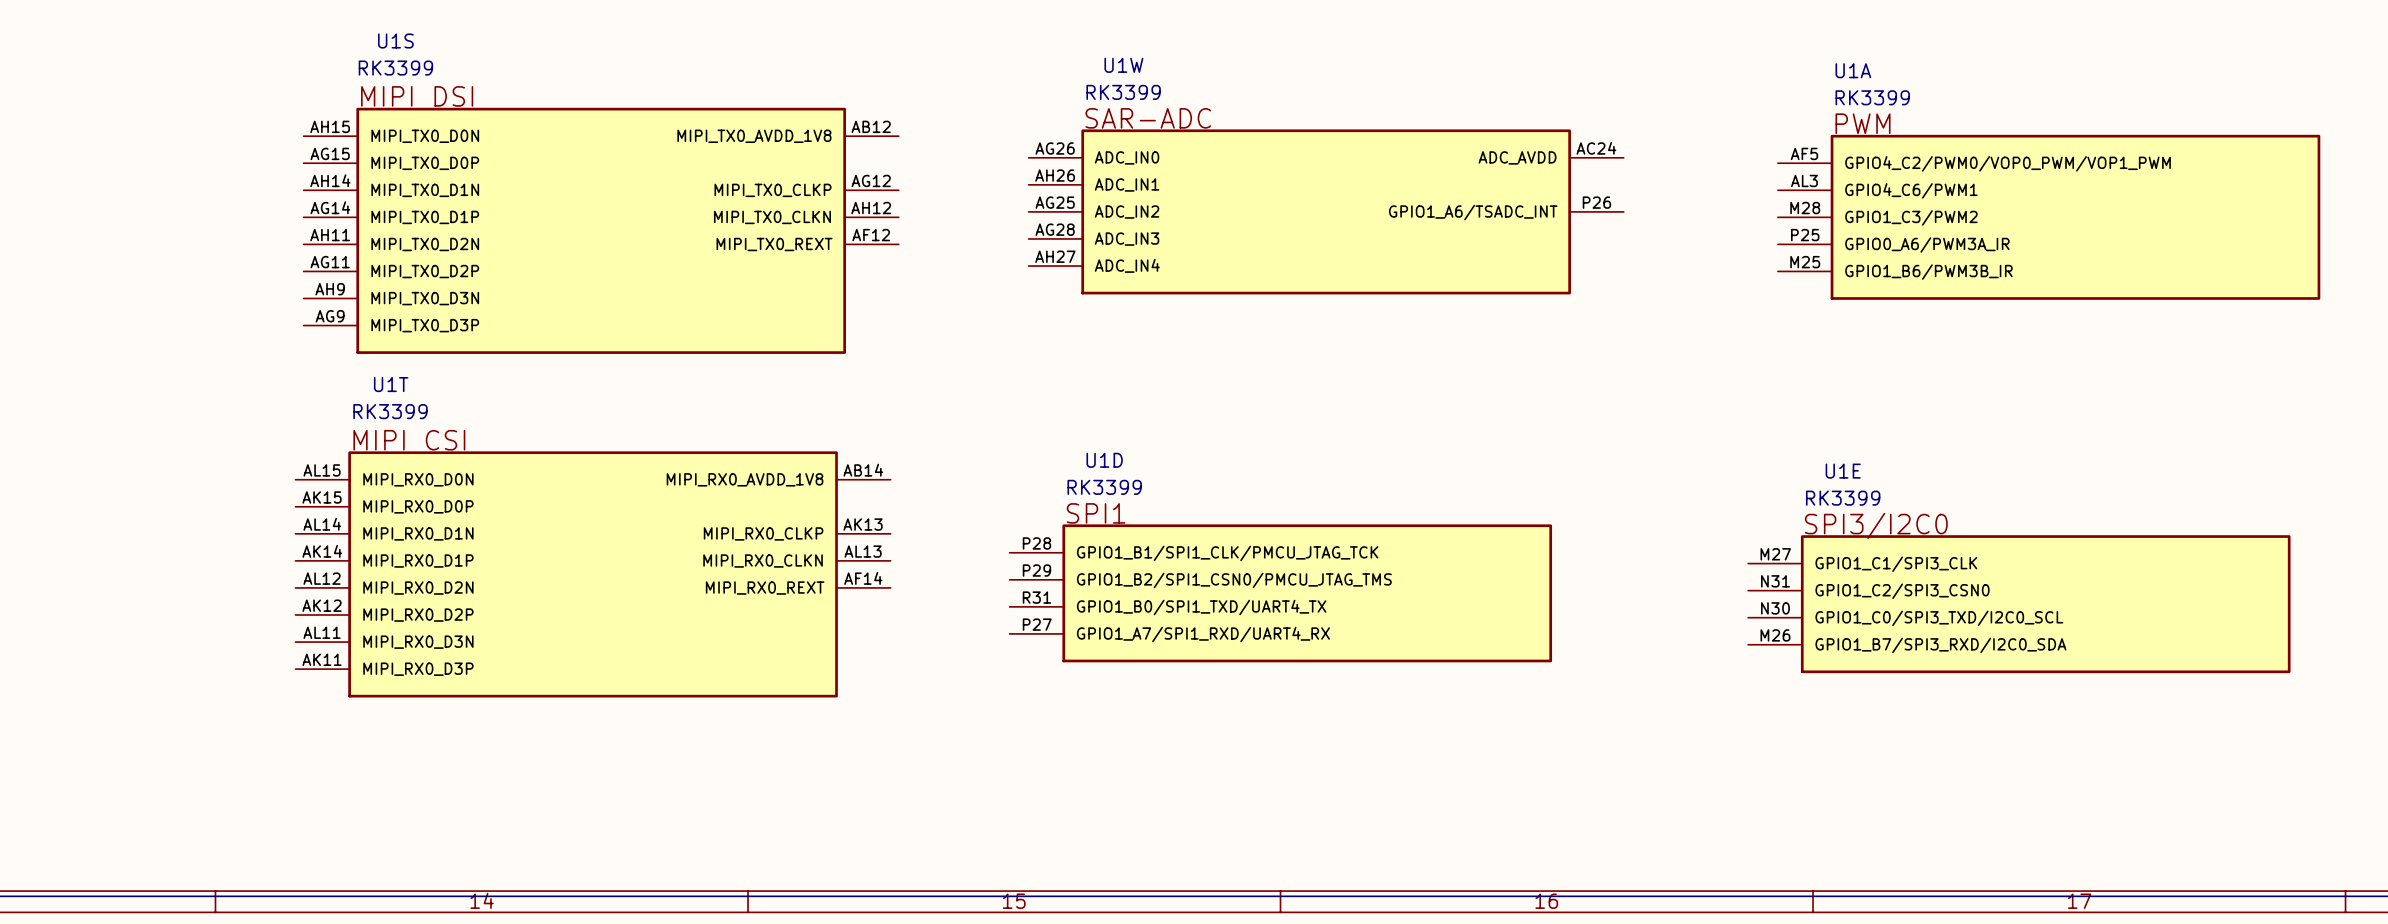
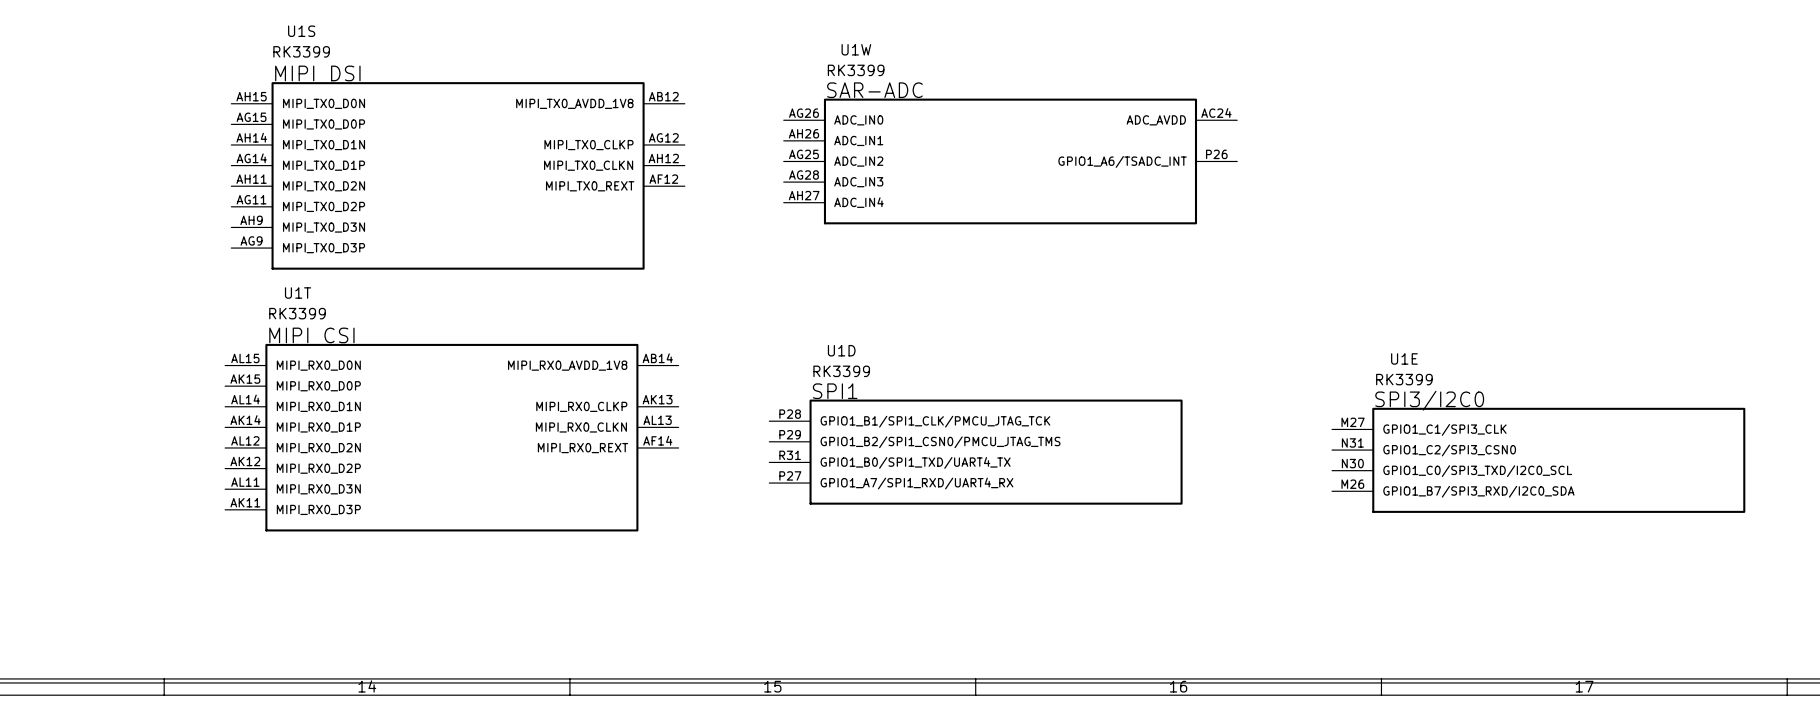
U1A: RK3399 (2049, 217) -> none

